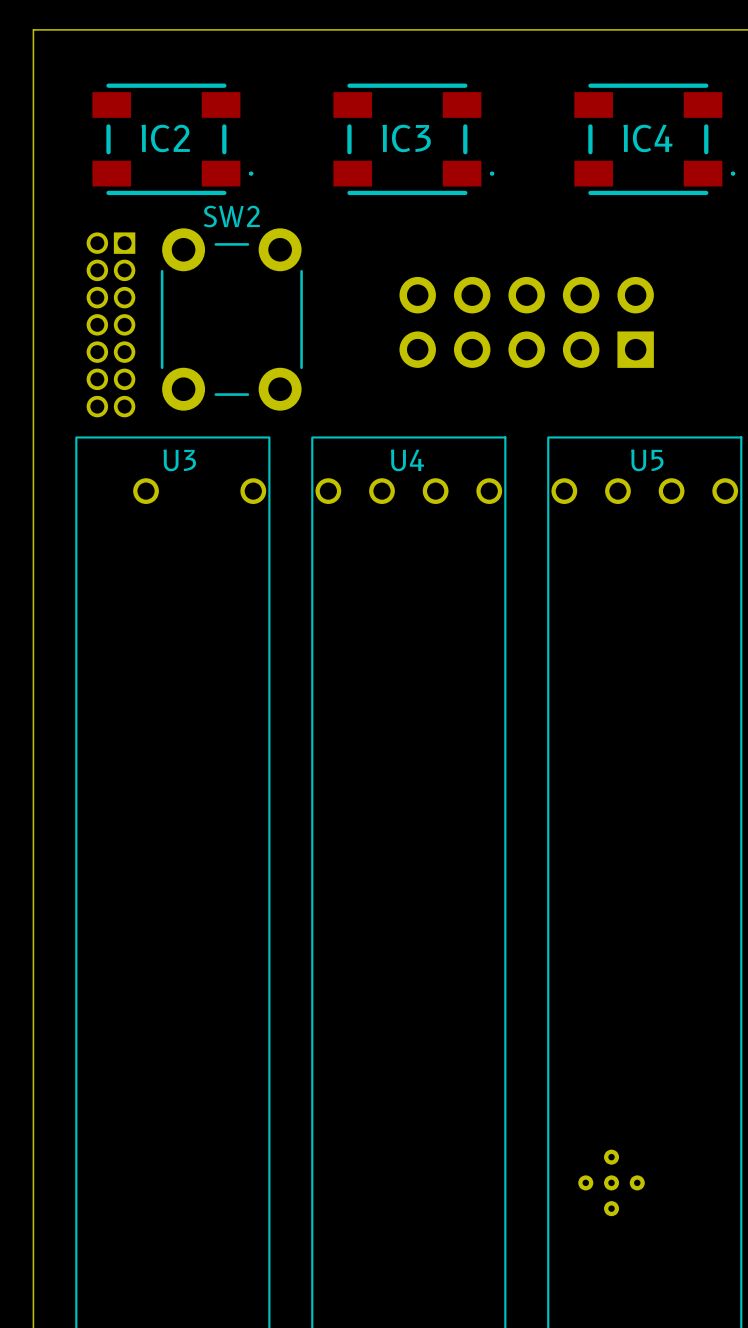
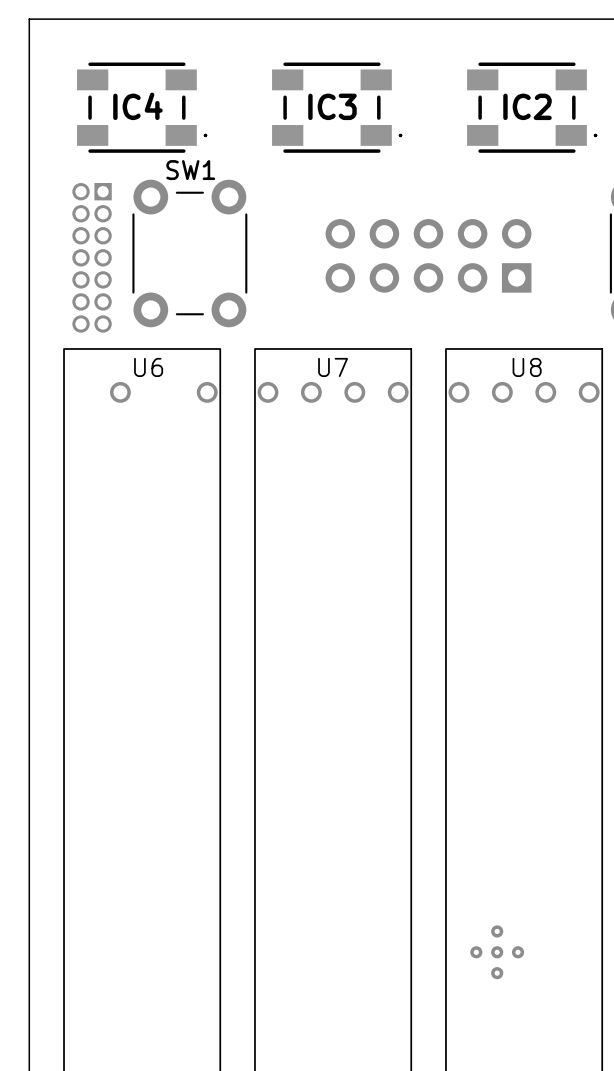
IC2 name: IC2 (165, 138) -> IC4 (137, 106)
IC4 name: IC4 (647, 138) -> IC2 (527, 106)
SW2 name: SW2 (231, 216) -> SW1 (190, 170)
U3 name: U3 (179, 460) -> U6 (148, 367)
U4 name: U4 (407, 460) -> U7 (333, 367)
U5 name: U5 (647, 460) -> U8 (527, 367)

